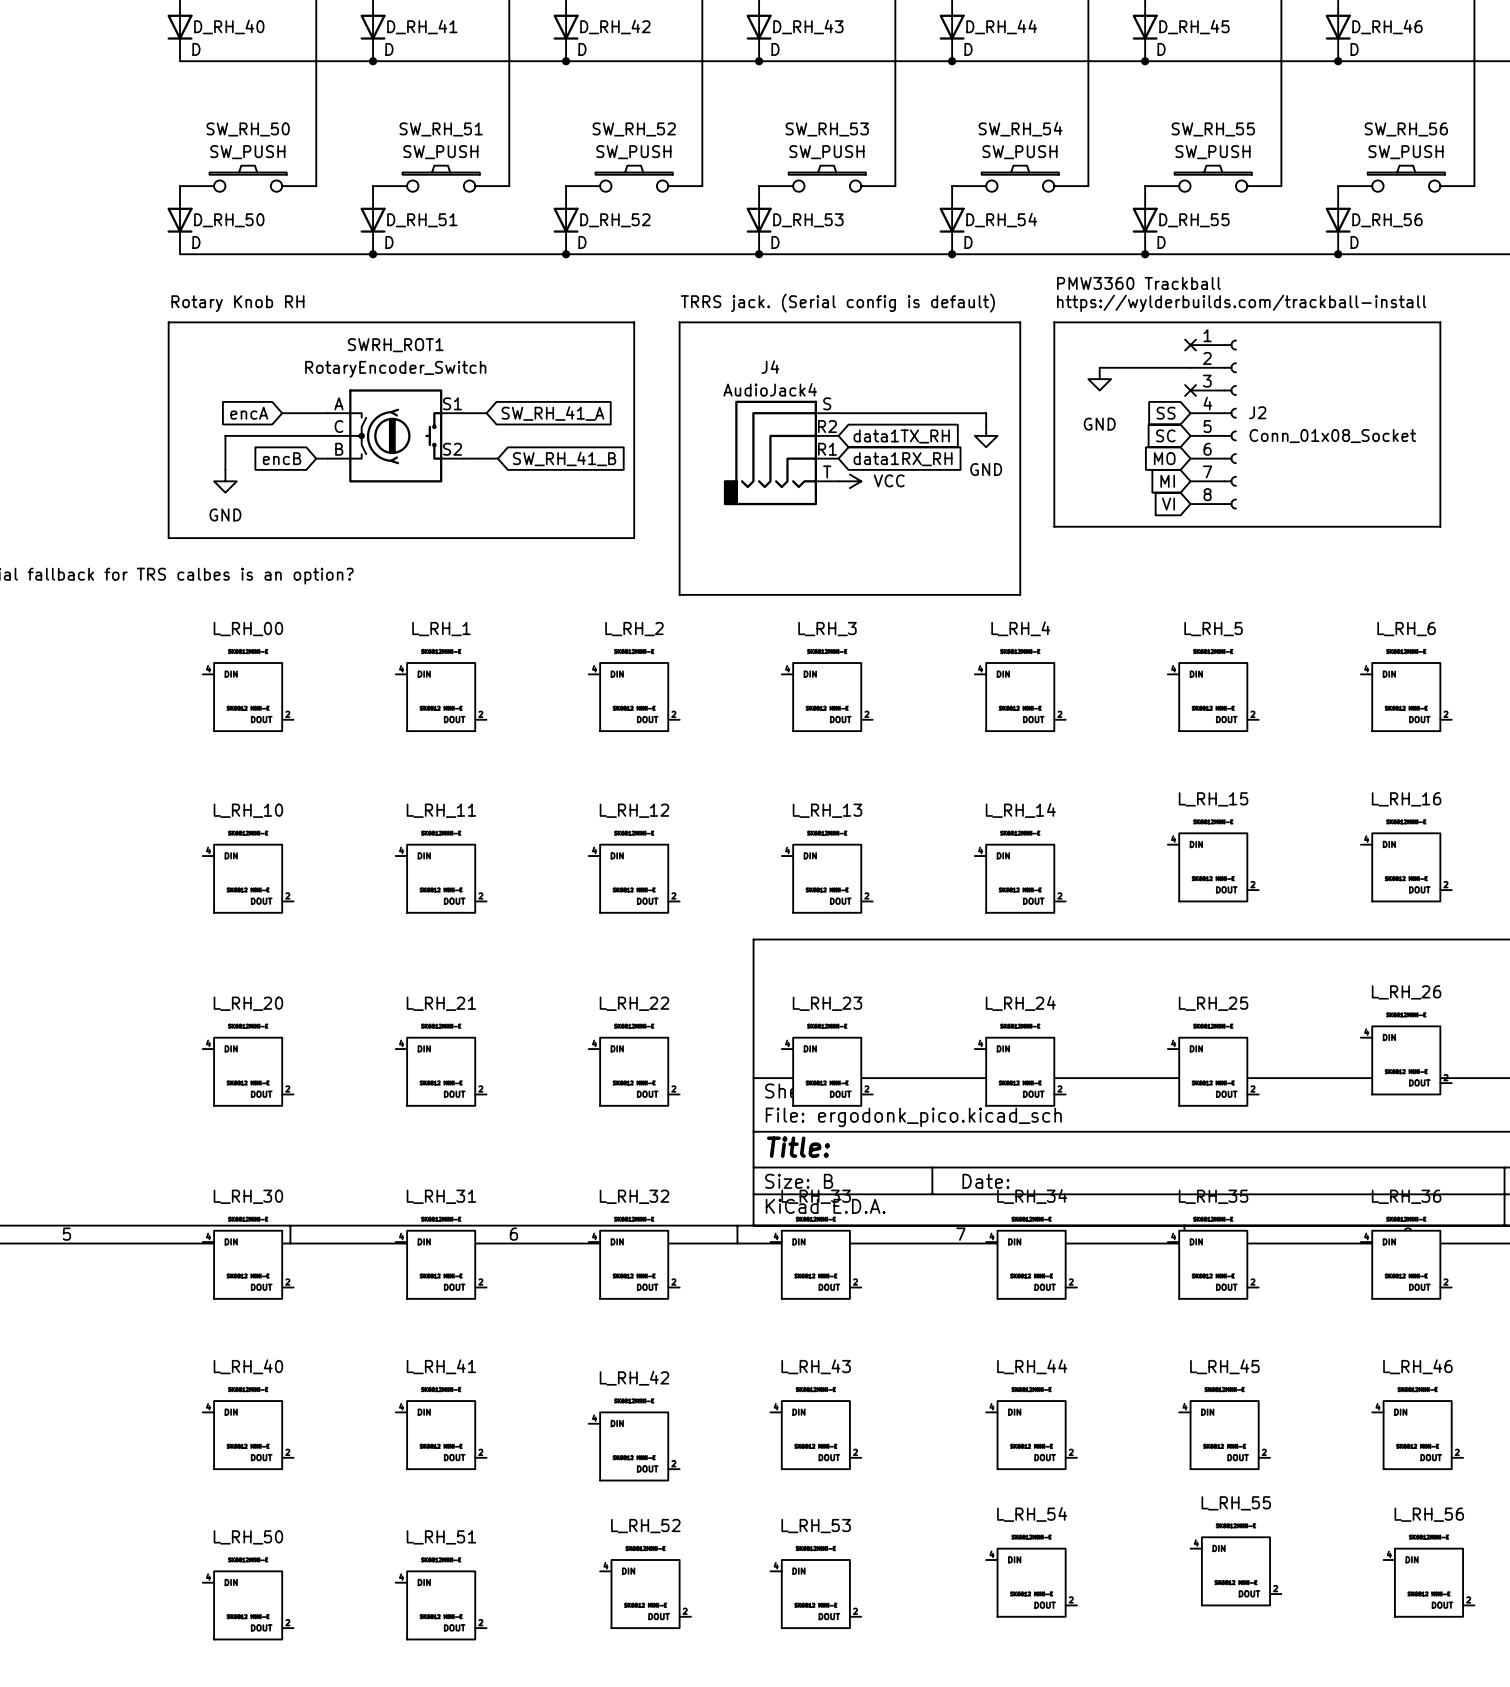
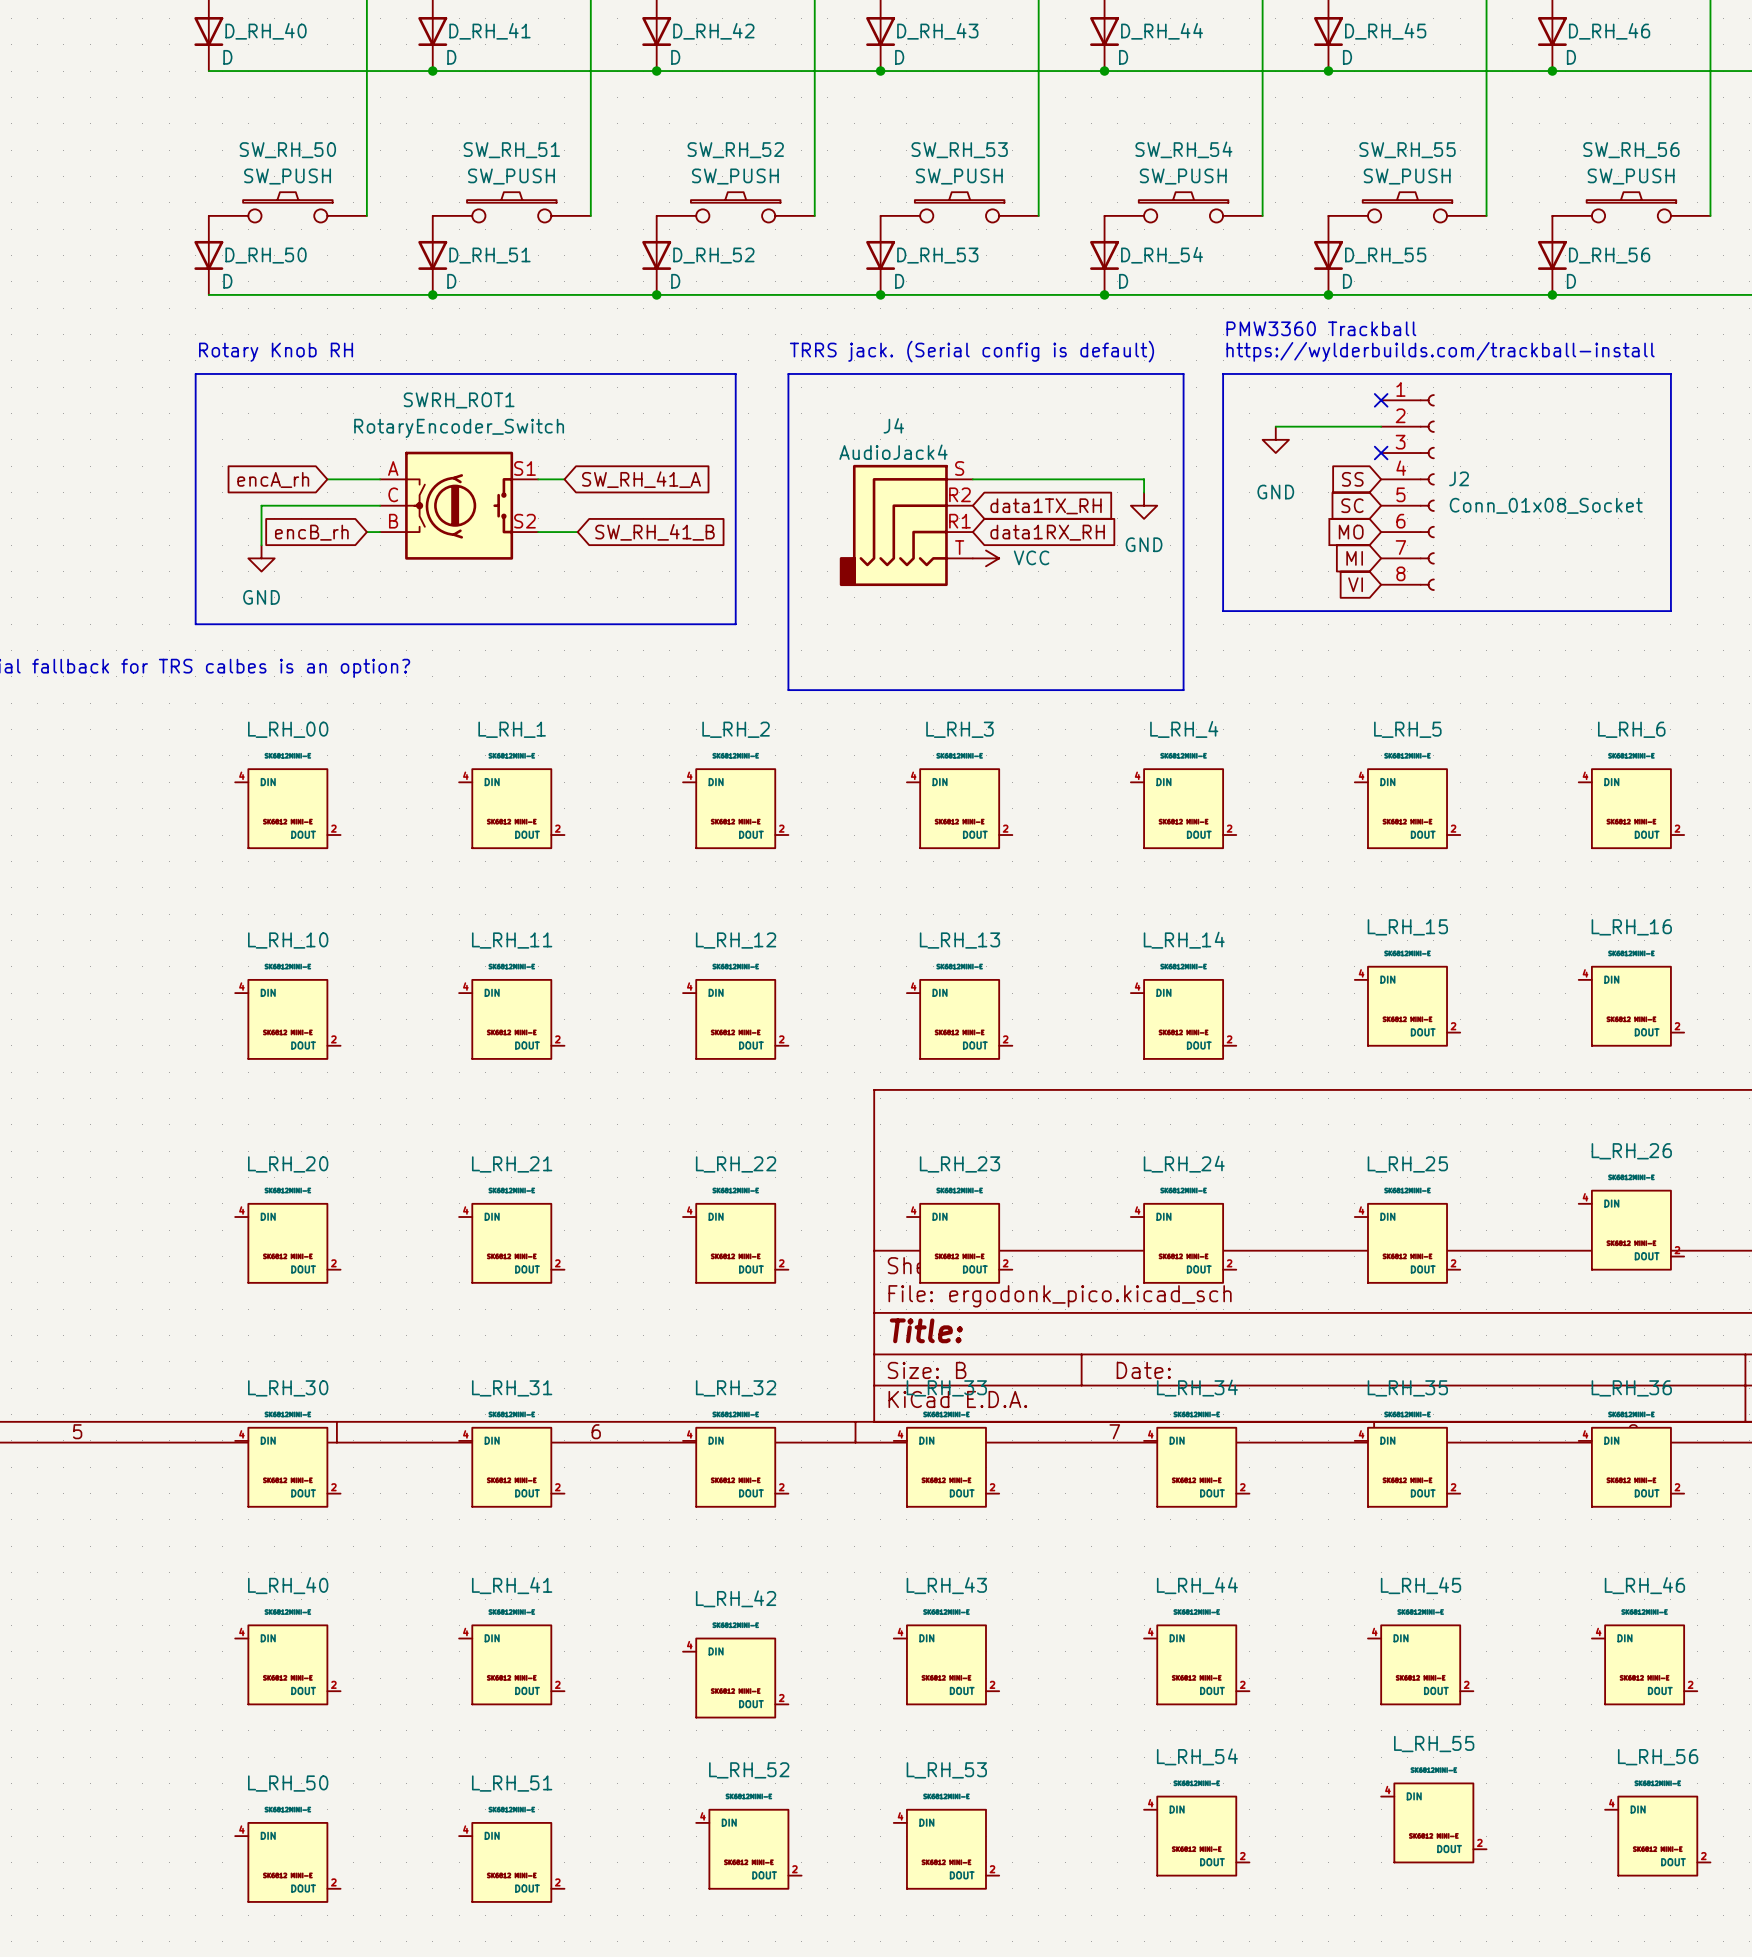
global label: encA (249, 413) -> encA_rh (273, 479)
global label: encB (282, 458) -> encB_rh (311, 532)

